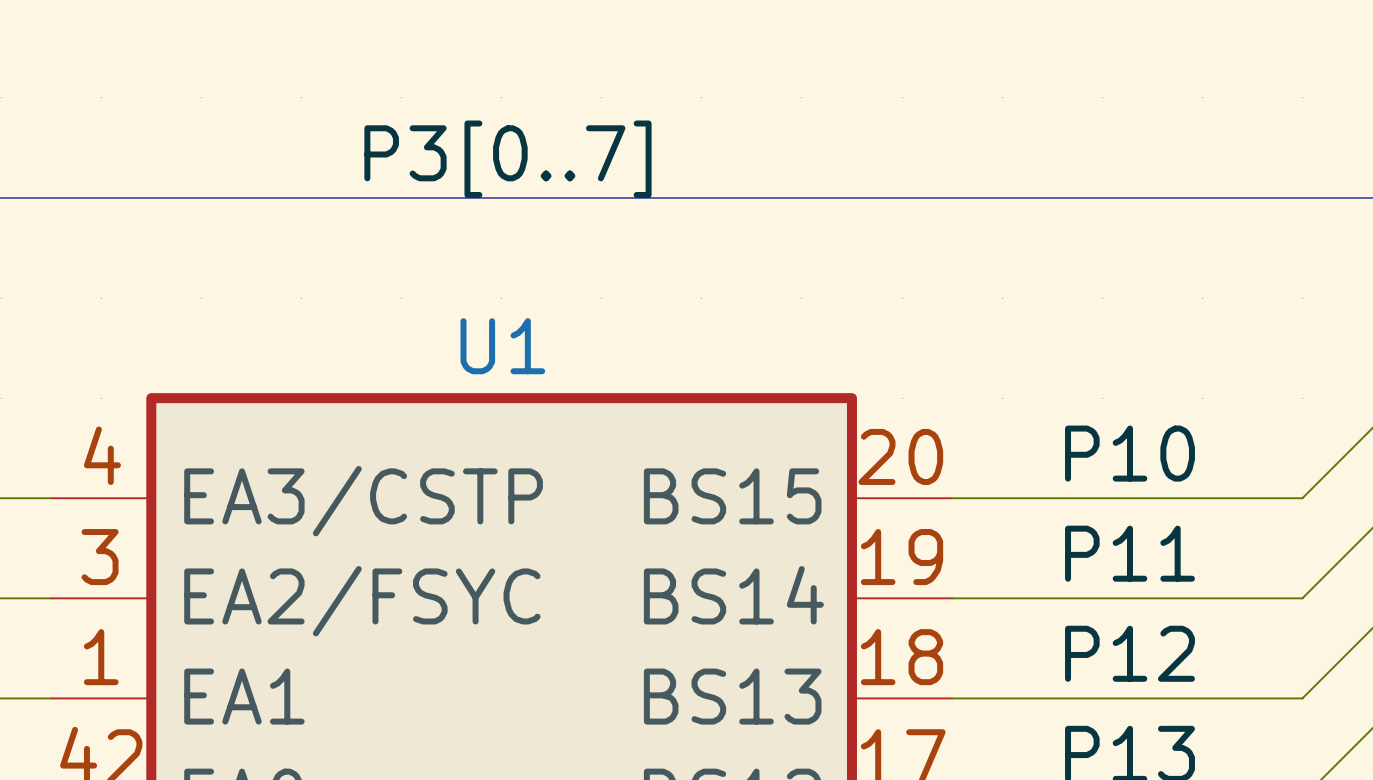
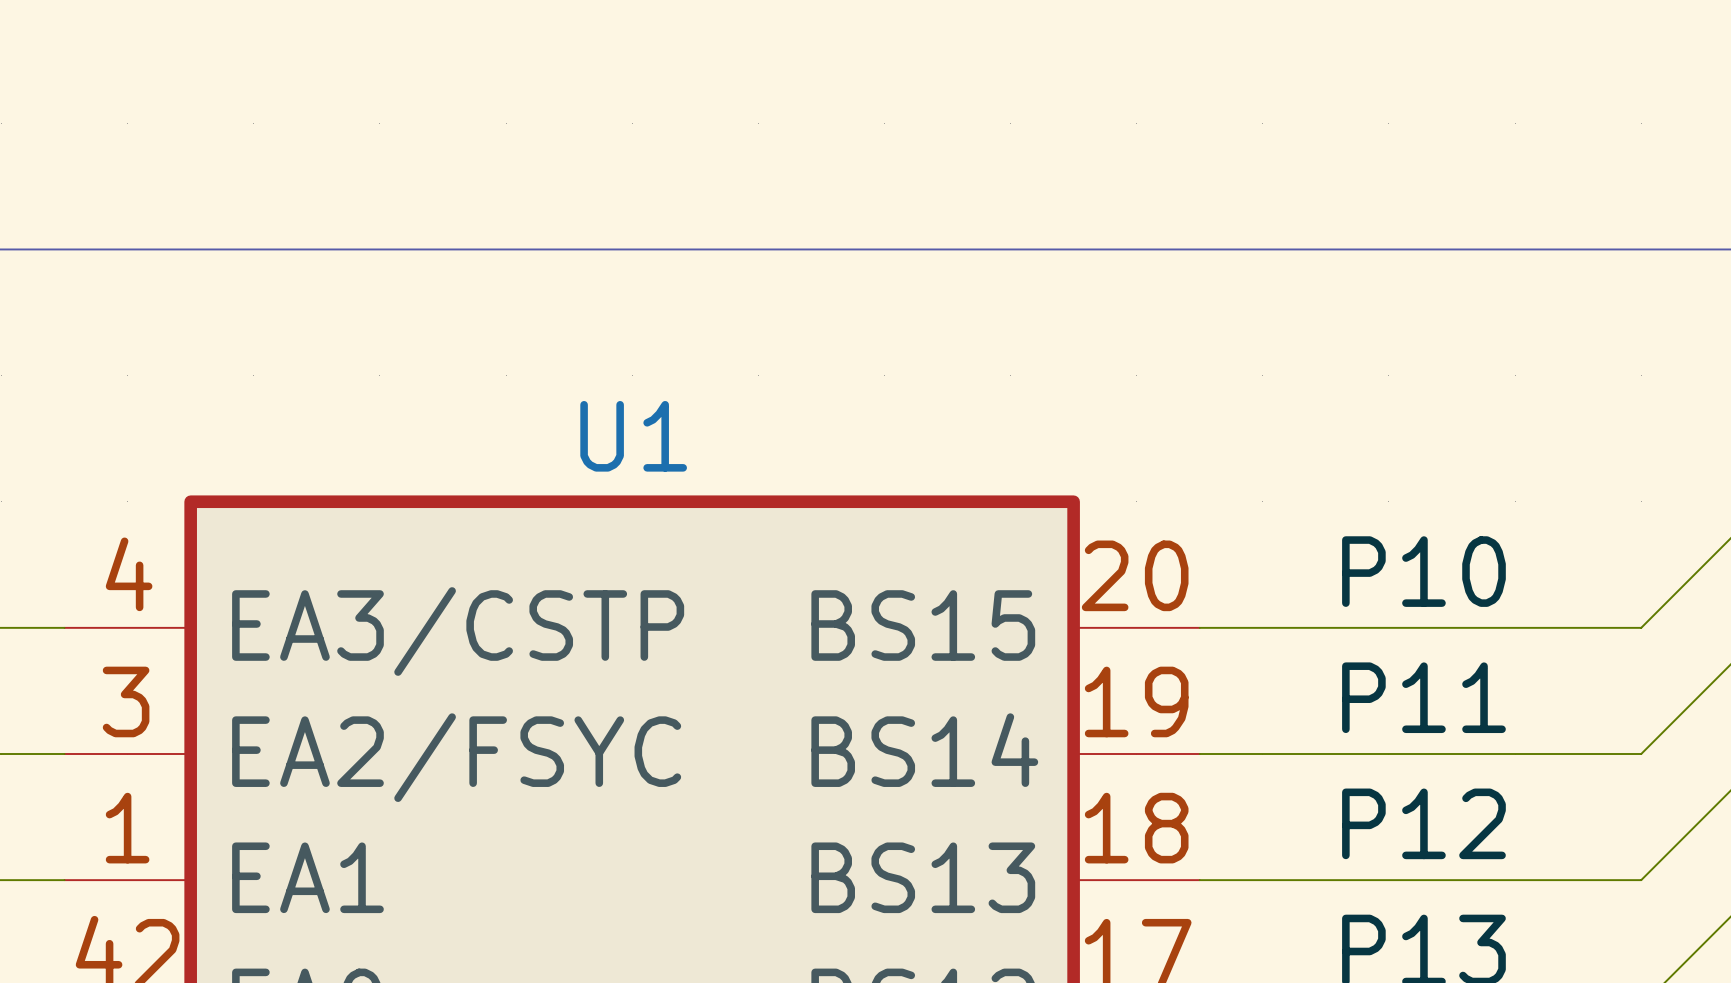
label: P3[0..7] (507, 159) -> none

